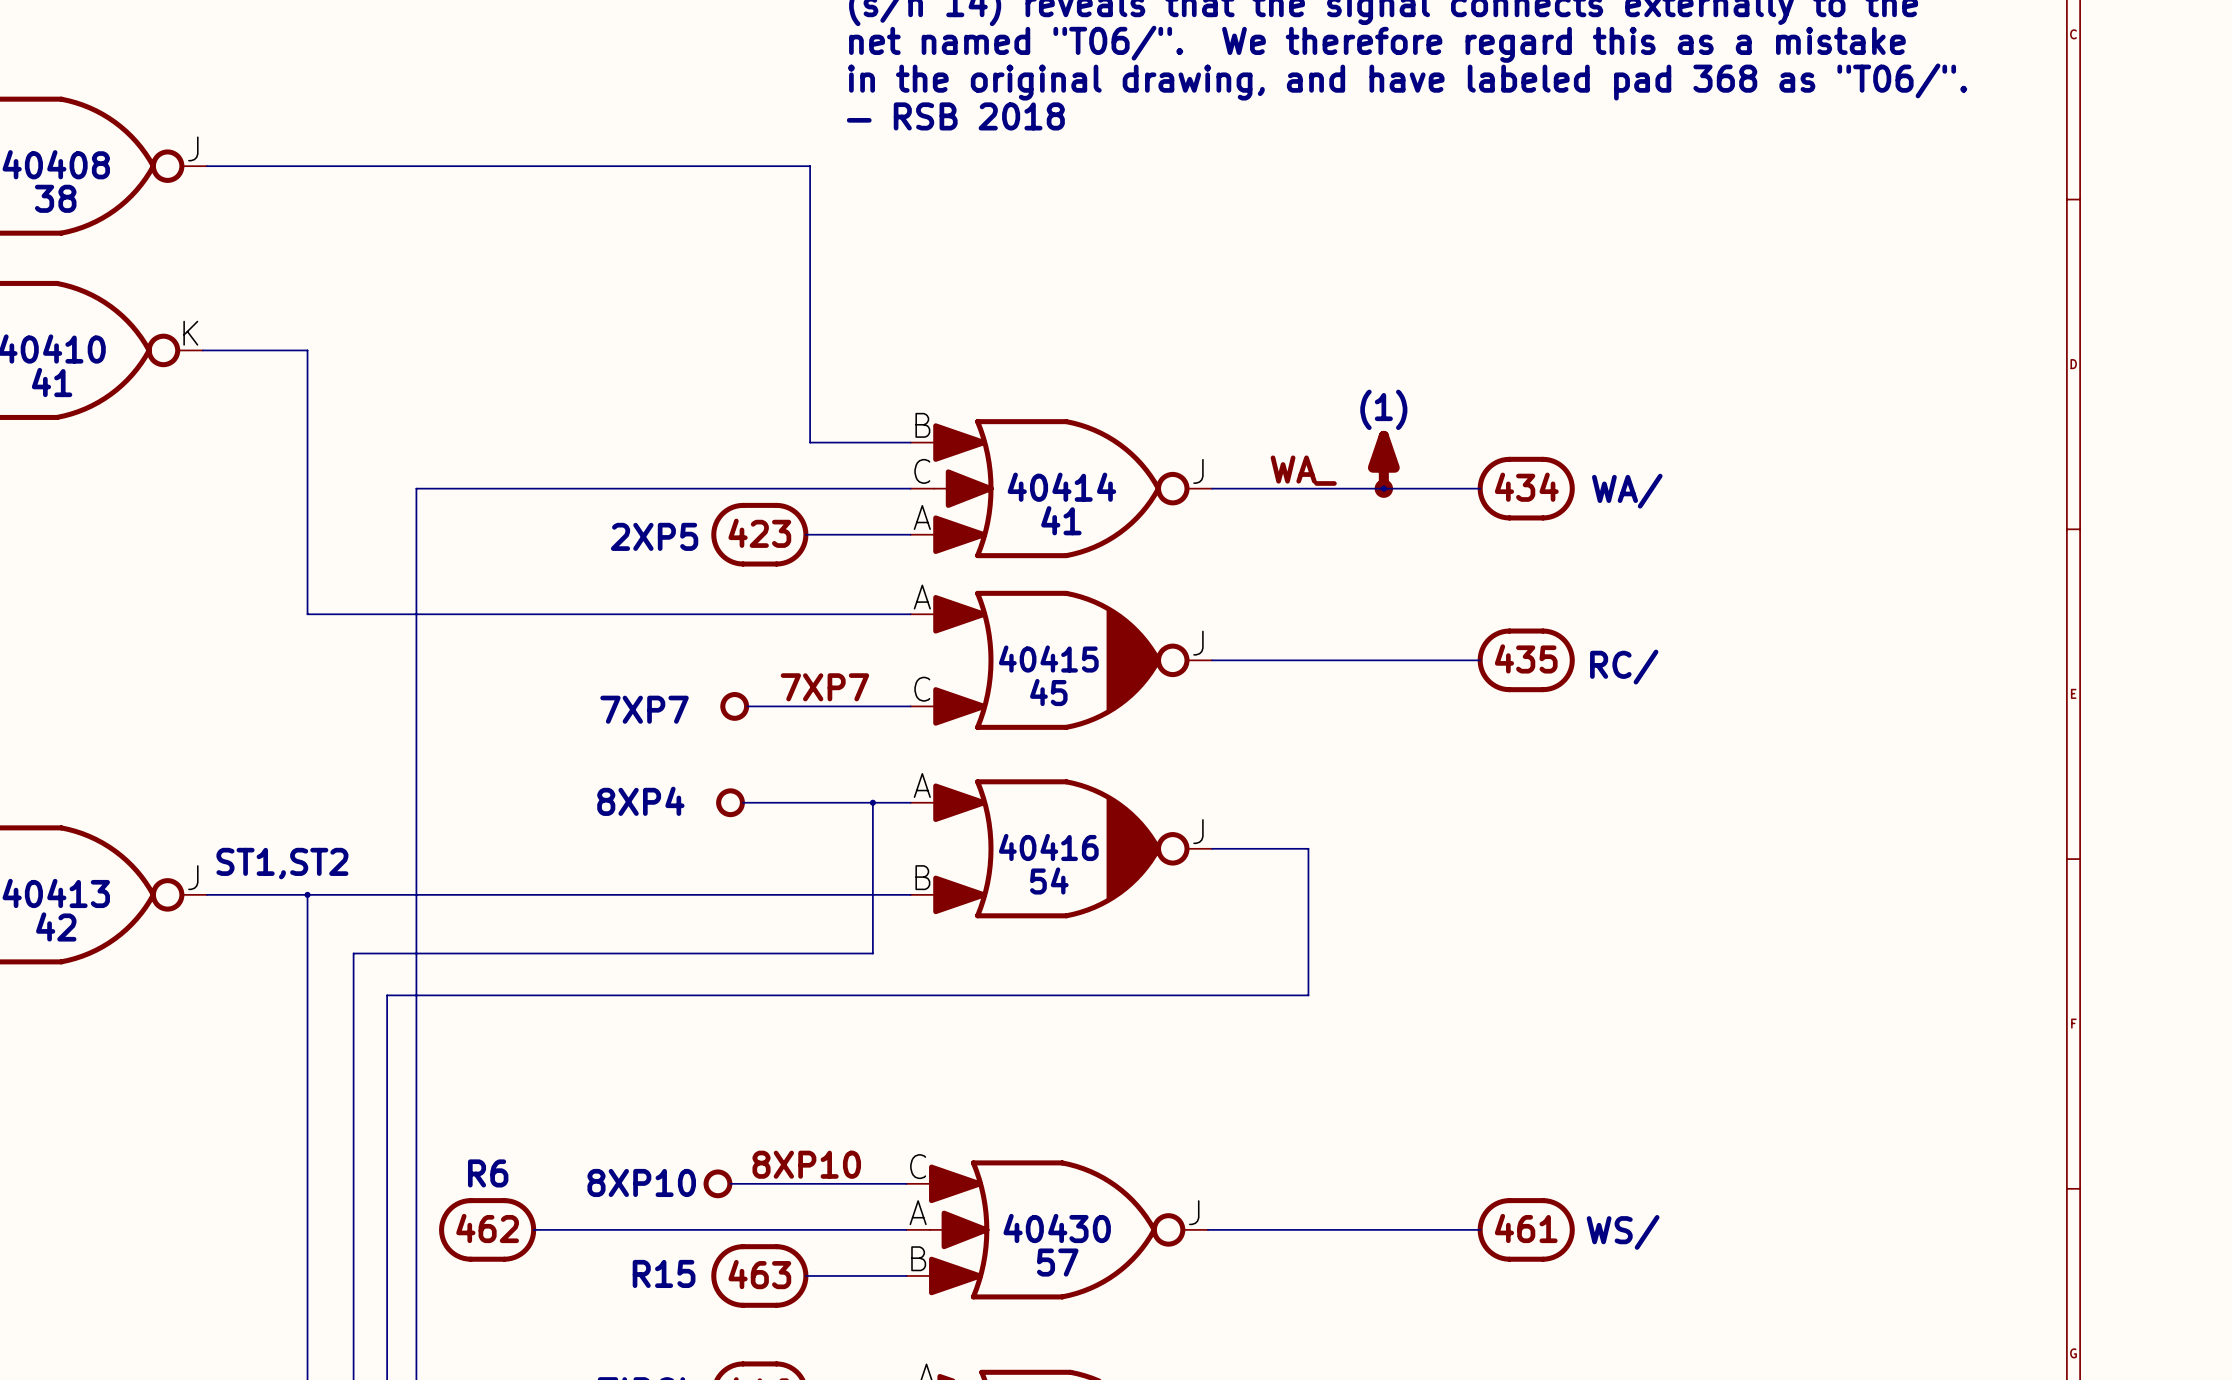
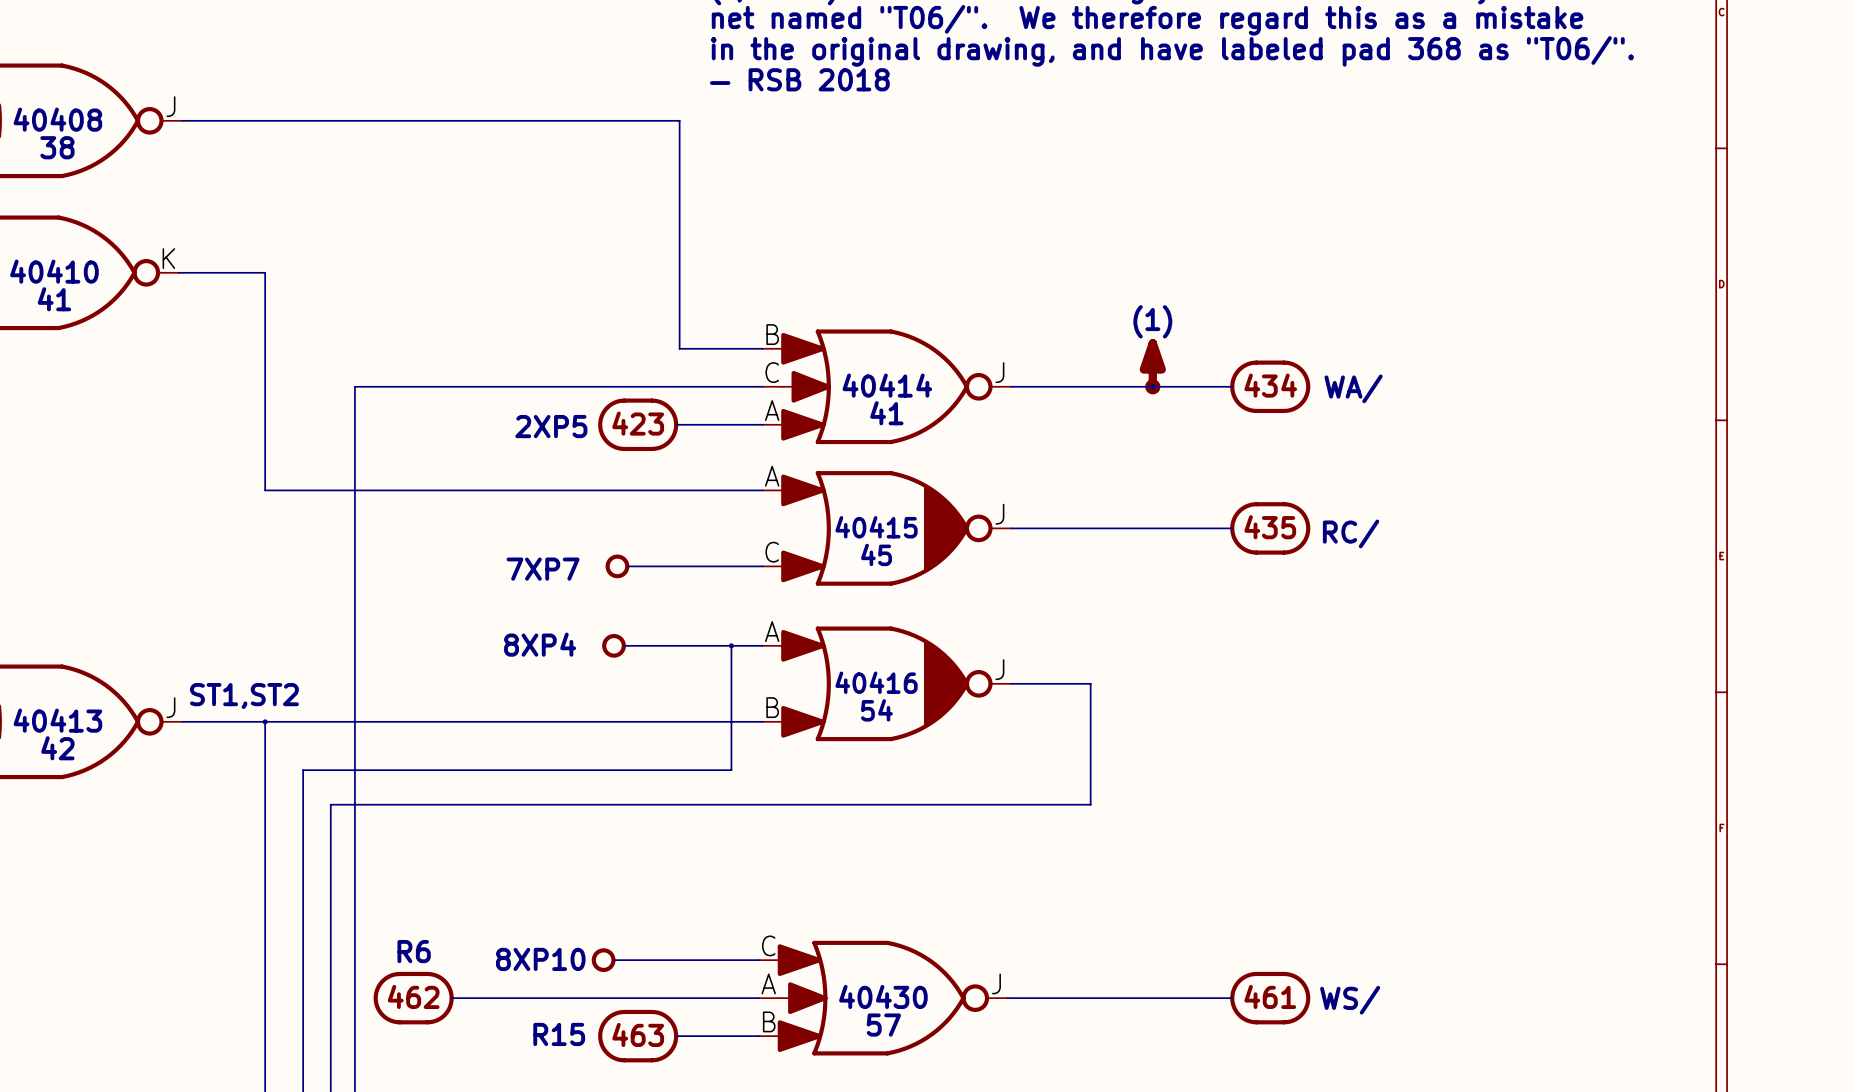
label: WA_ (1303, 470) -> none
label: 7XP7 (824, 687) -> none
label: 8XP10 (806, 1164) -> none

